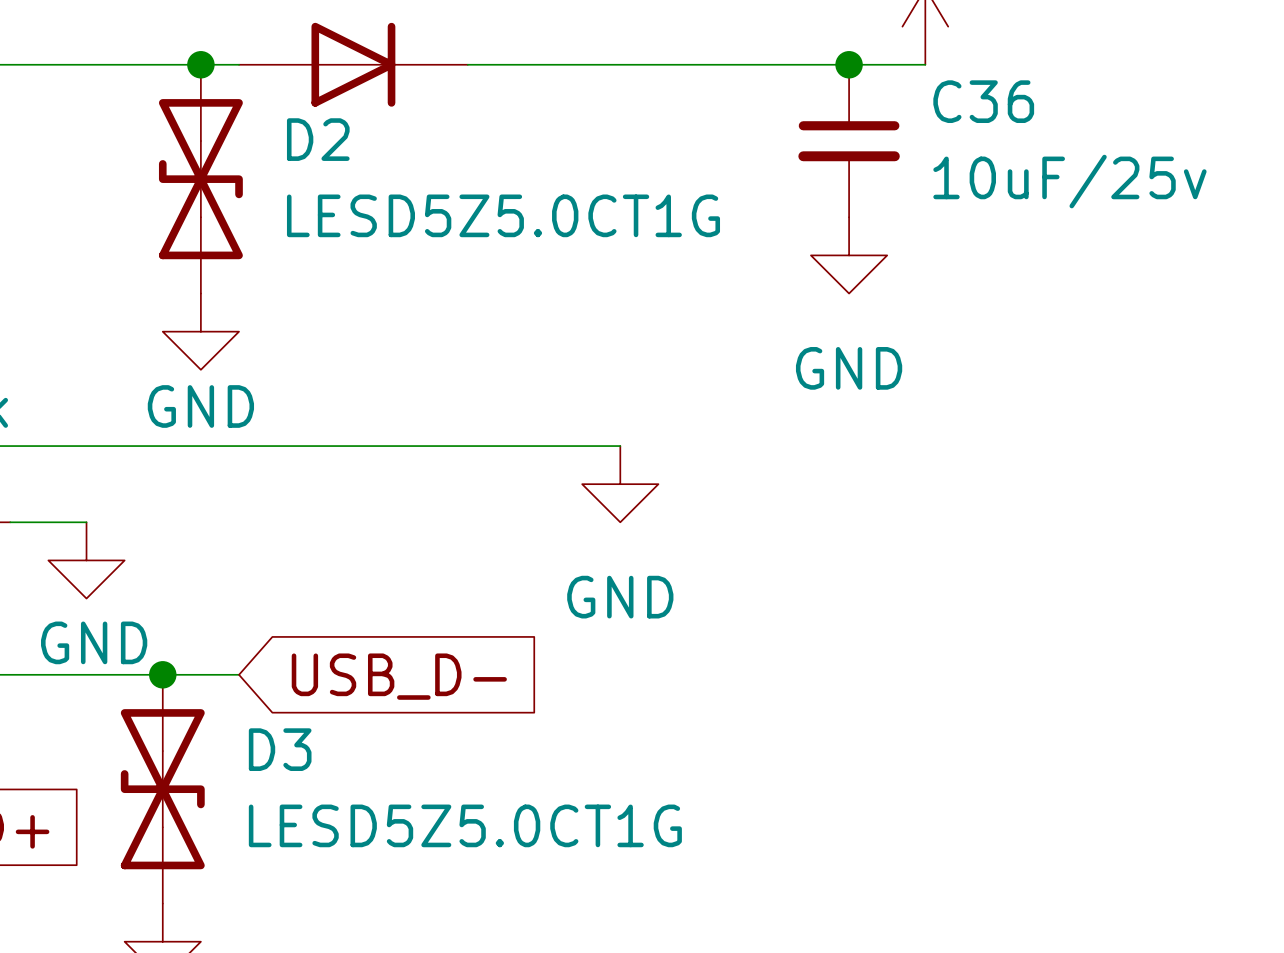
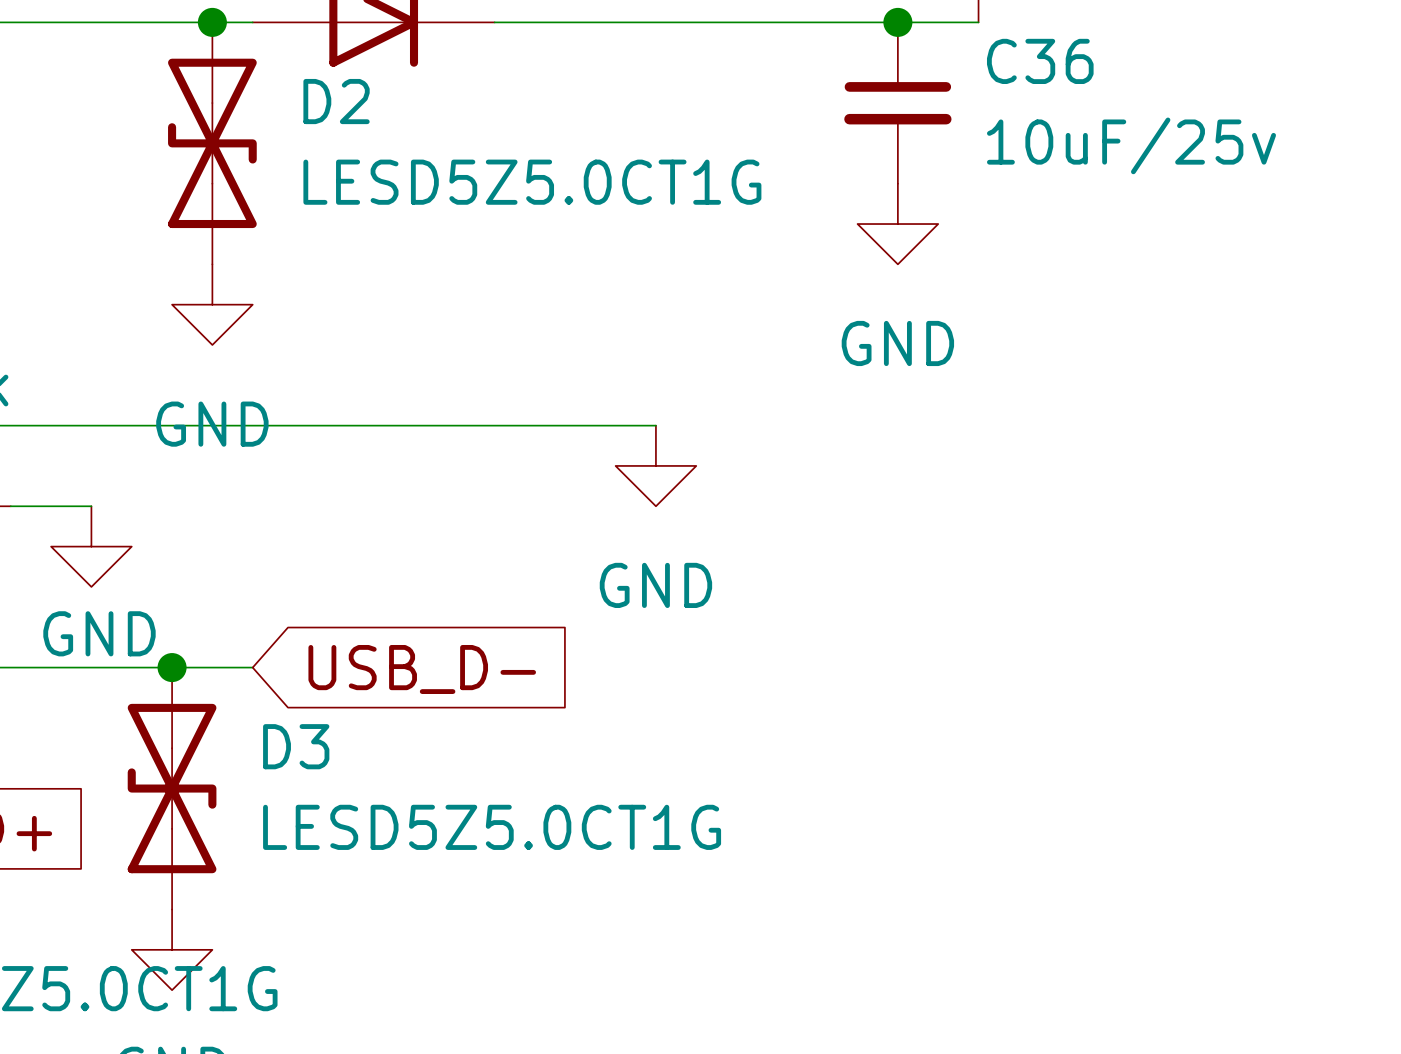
power symbol text position: GND (200, 406) -> GND (212, 424)

